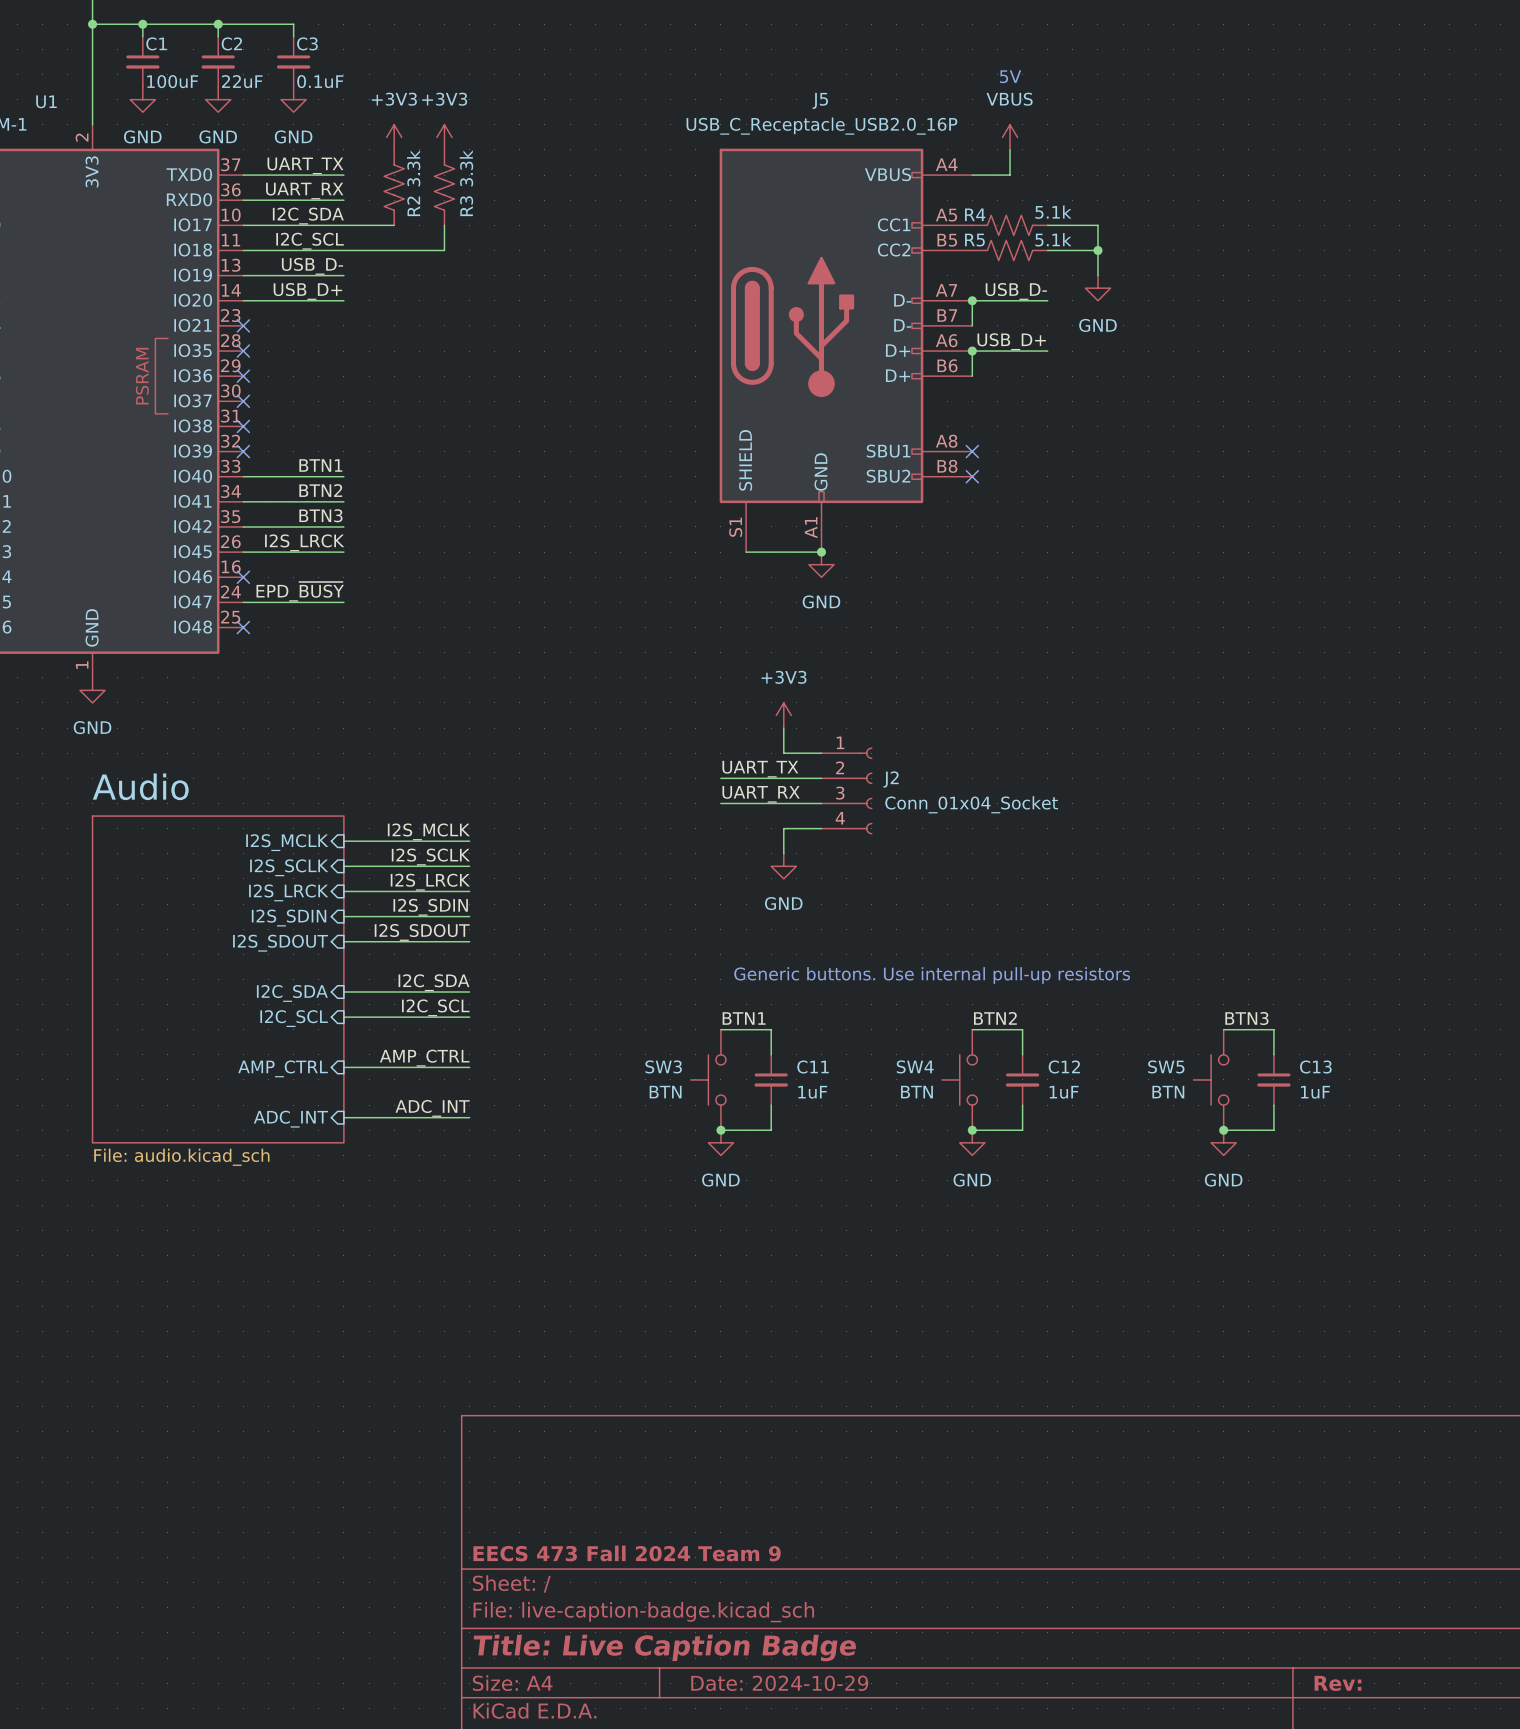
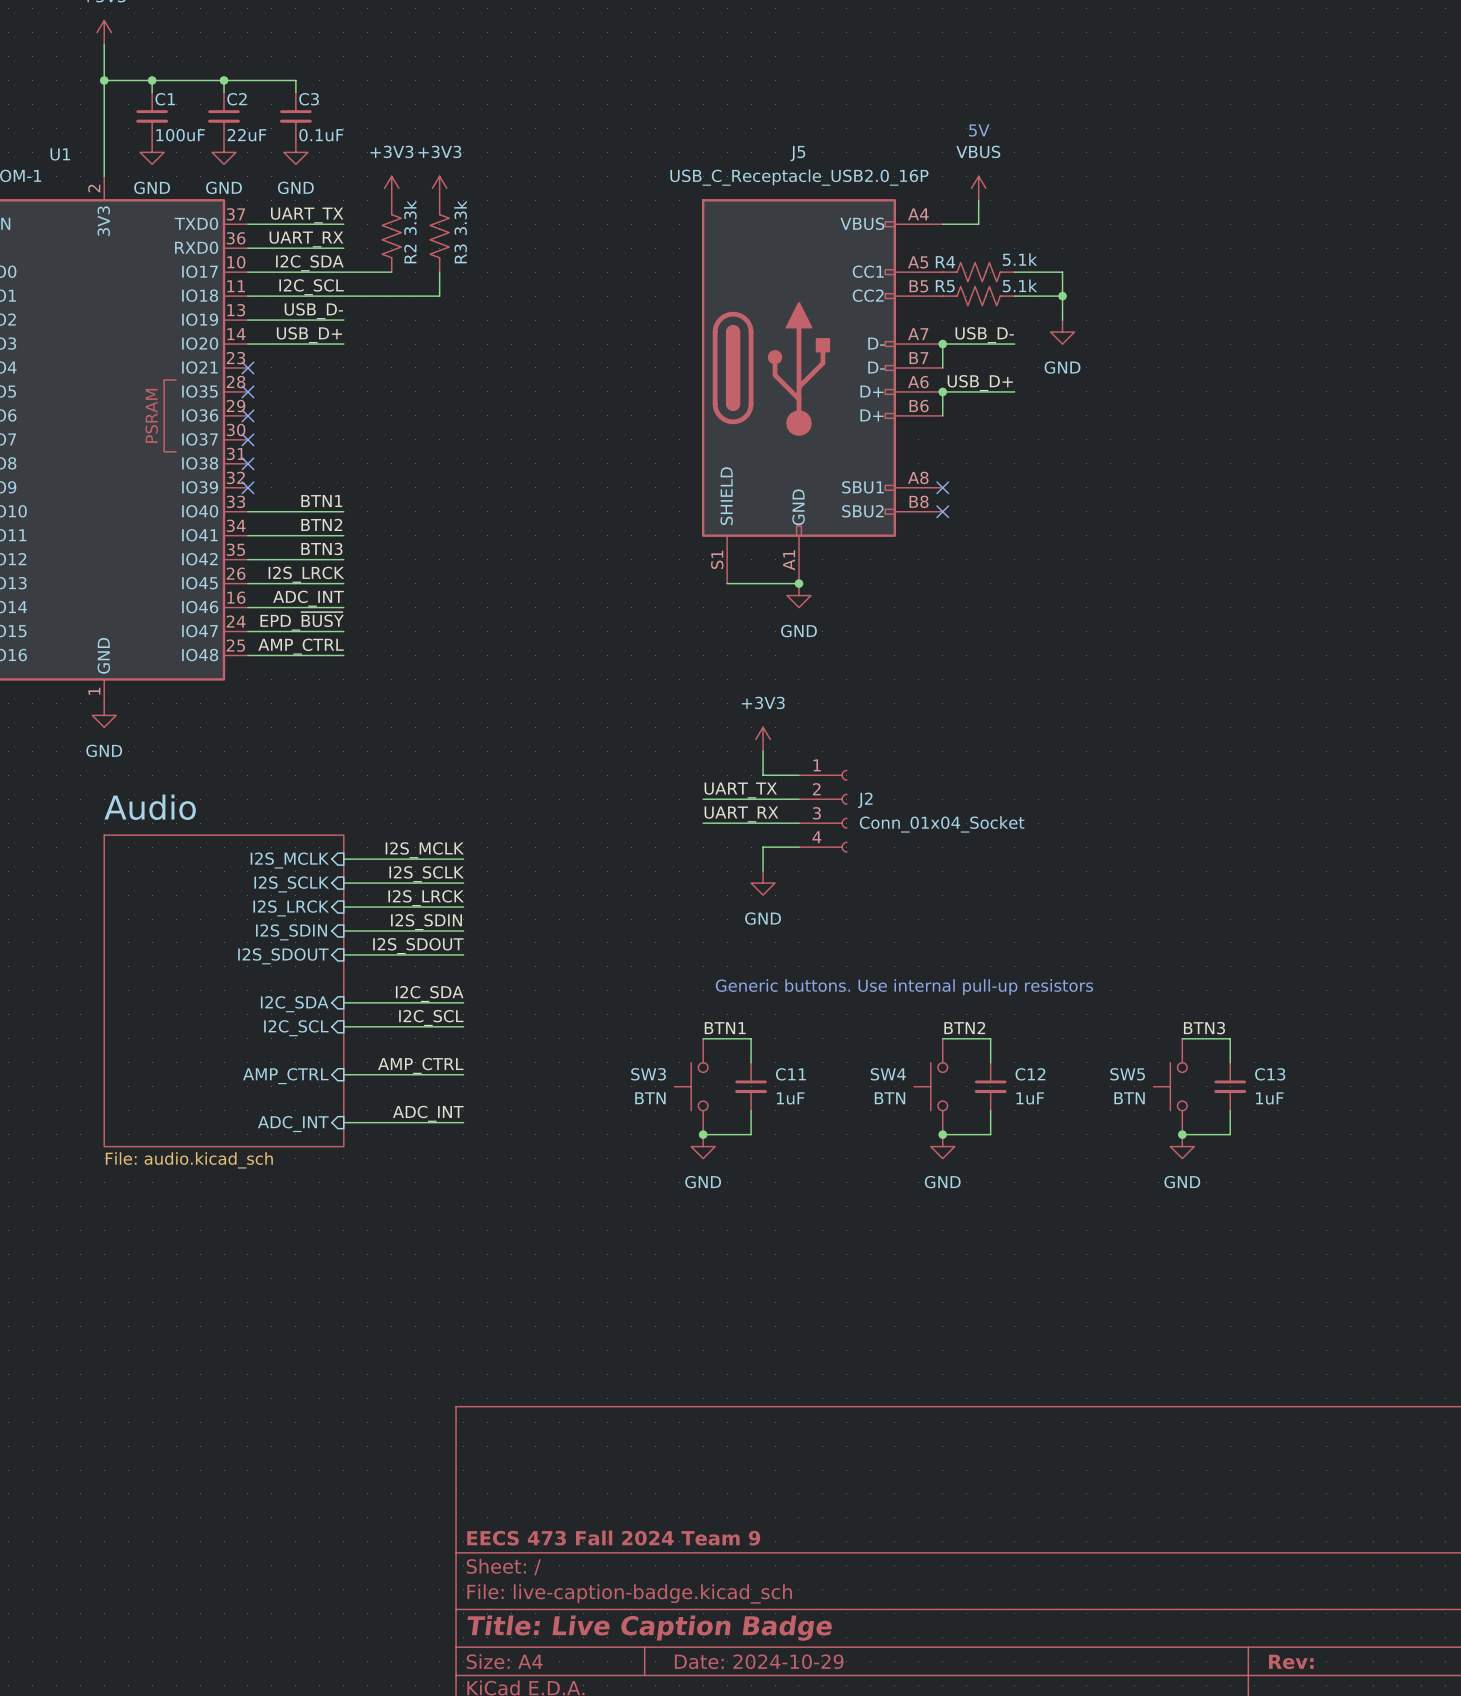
label: none -> ADC_INT (308, 598)
wire: none -> (247, 607) (343, 607)
no-connect mark: (243, 577) -> none
label: none -> AMP_CTRL (301, 646)
wire: none -> (247, 655) (343, 655)
no-connect mark: (243, 627) -> none

